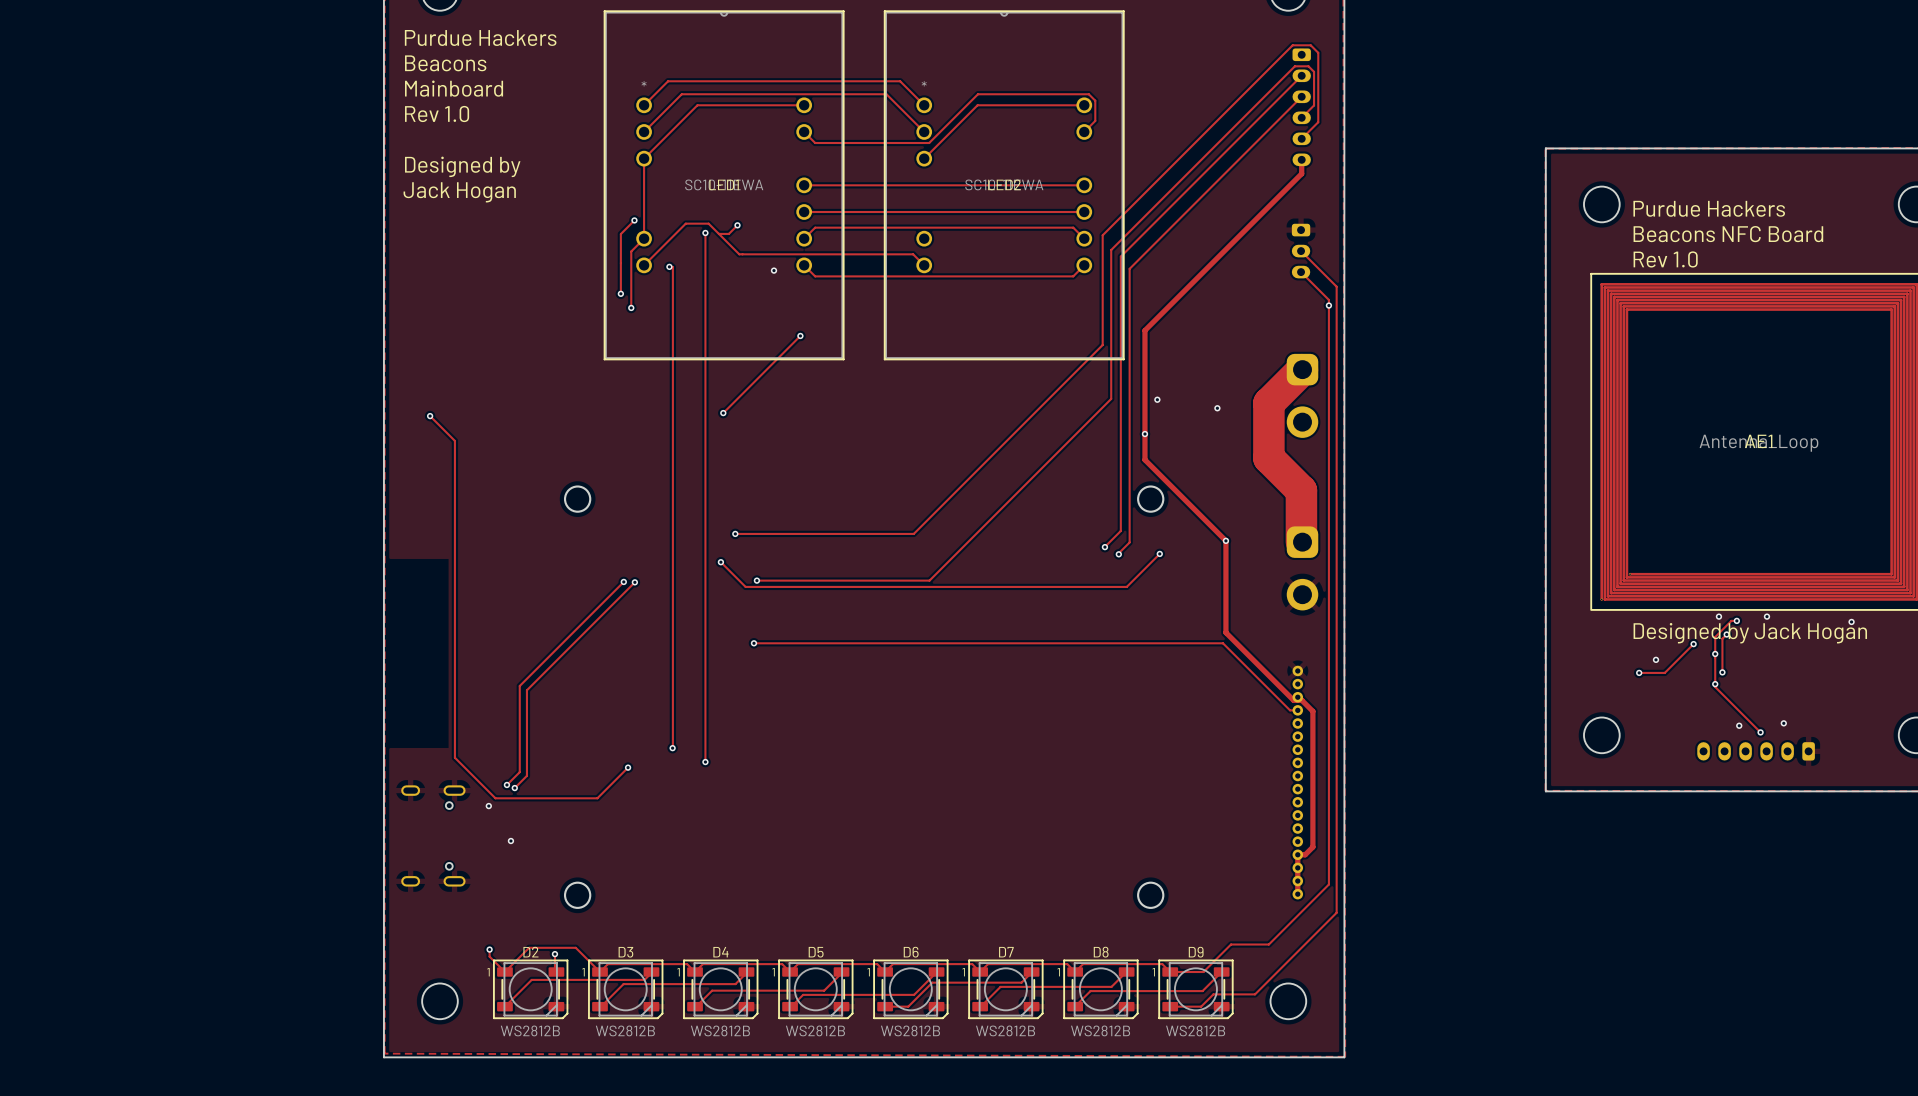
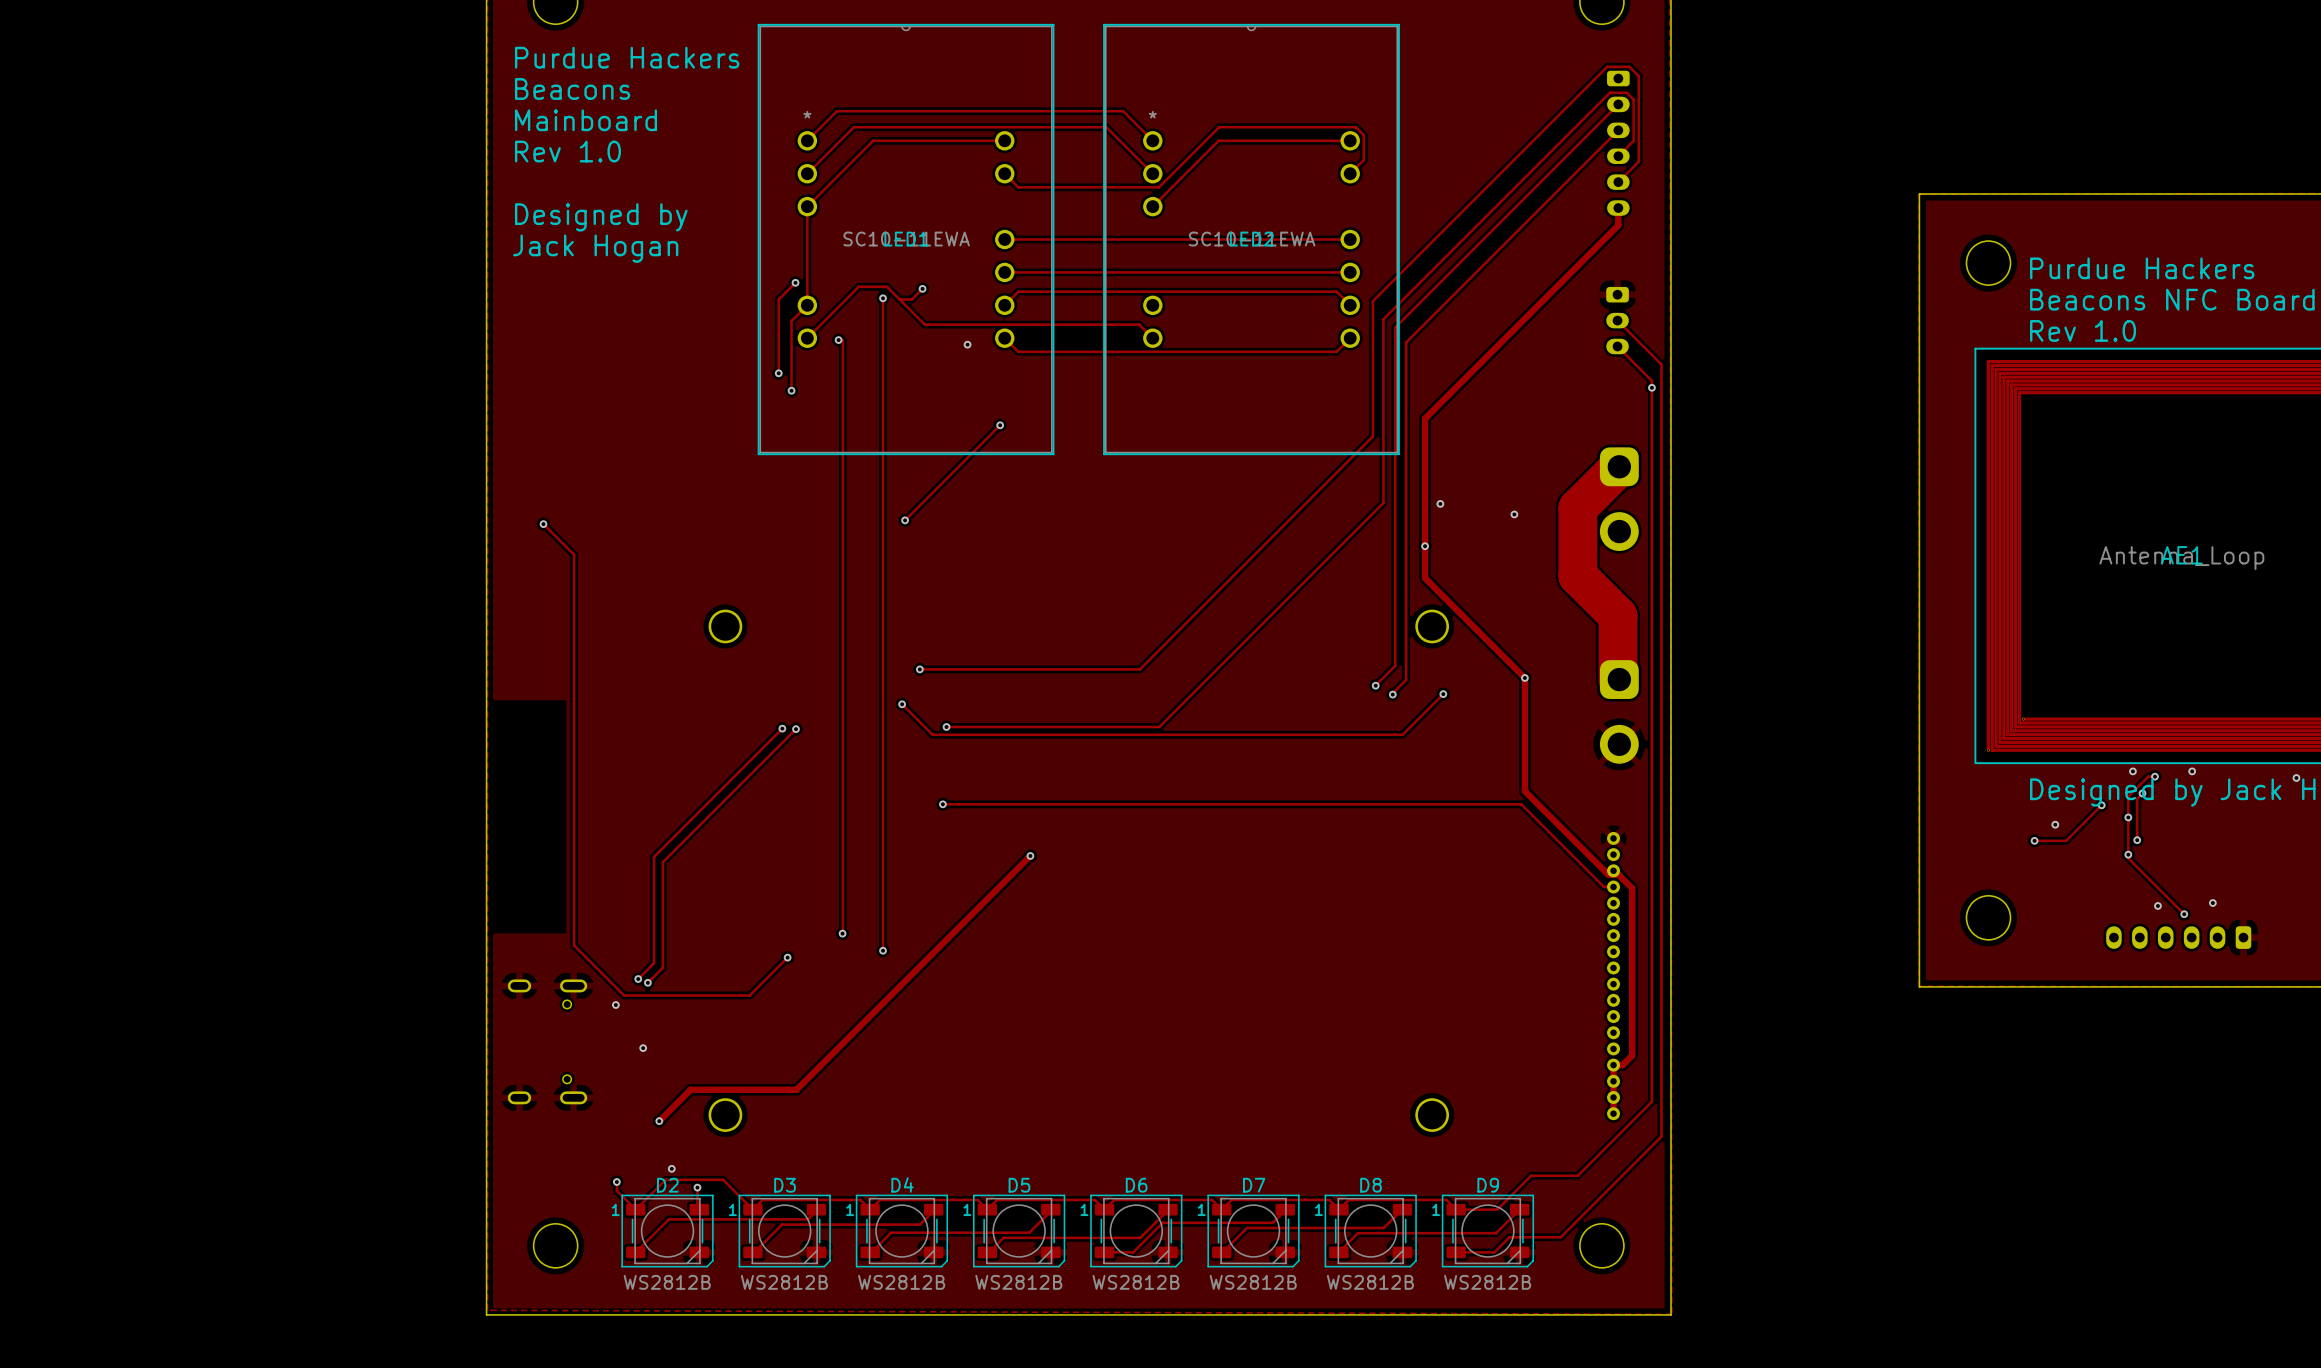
track: none -> (1030, 855) (796, 1089) (690, 1089) (659, 1121)
via: none -> (1030, 855)
via: none -> (659, 1121)
via: none -> (671, 1168)

